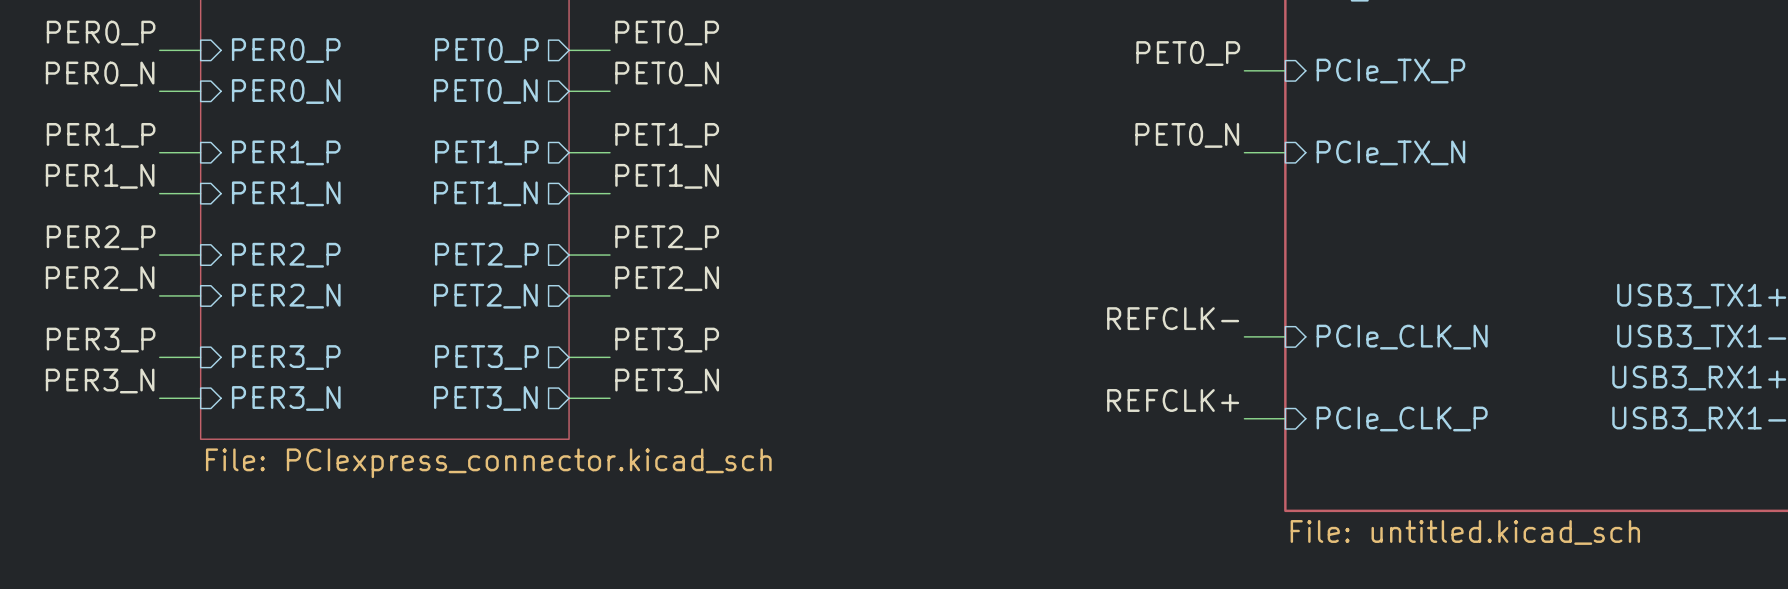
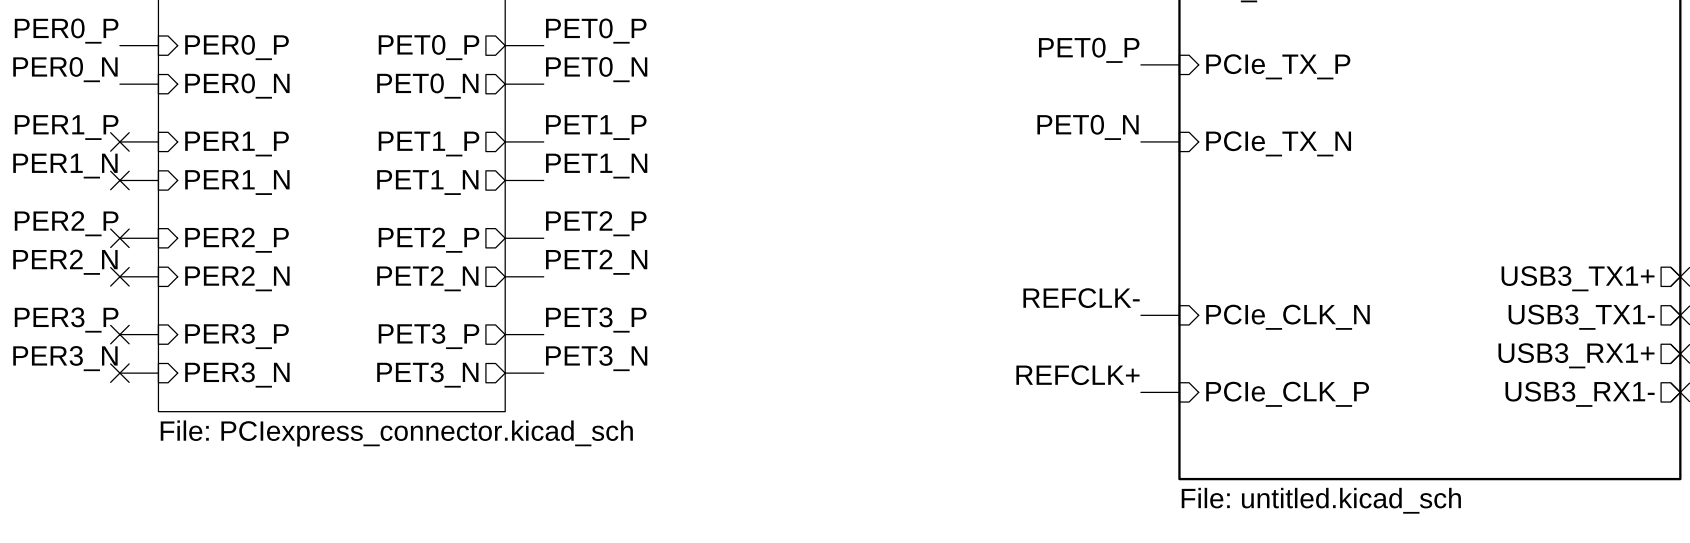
no-connect mark: none -> (119, 141)
no-connect mark: none -> (119, 180)
no-connect mark: none -> (119, 238)
no-connect mark: none -> (119, 276)
no-connect mark: none -> (119, 334)
no-connect mark: none -> (119, 373)

